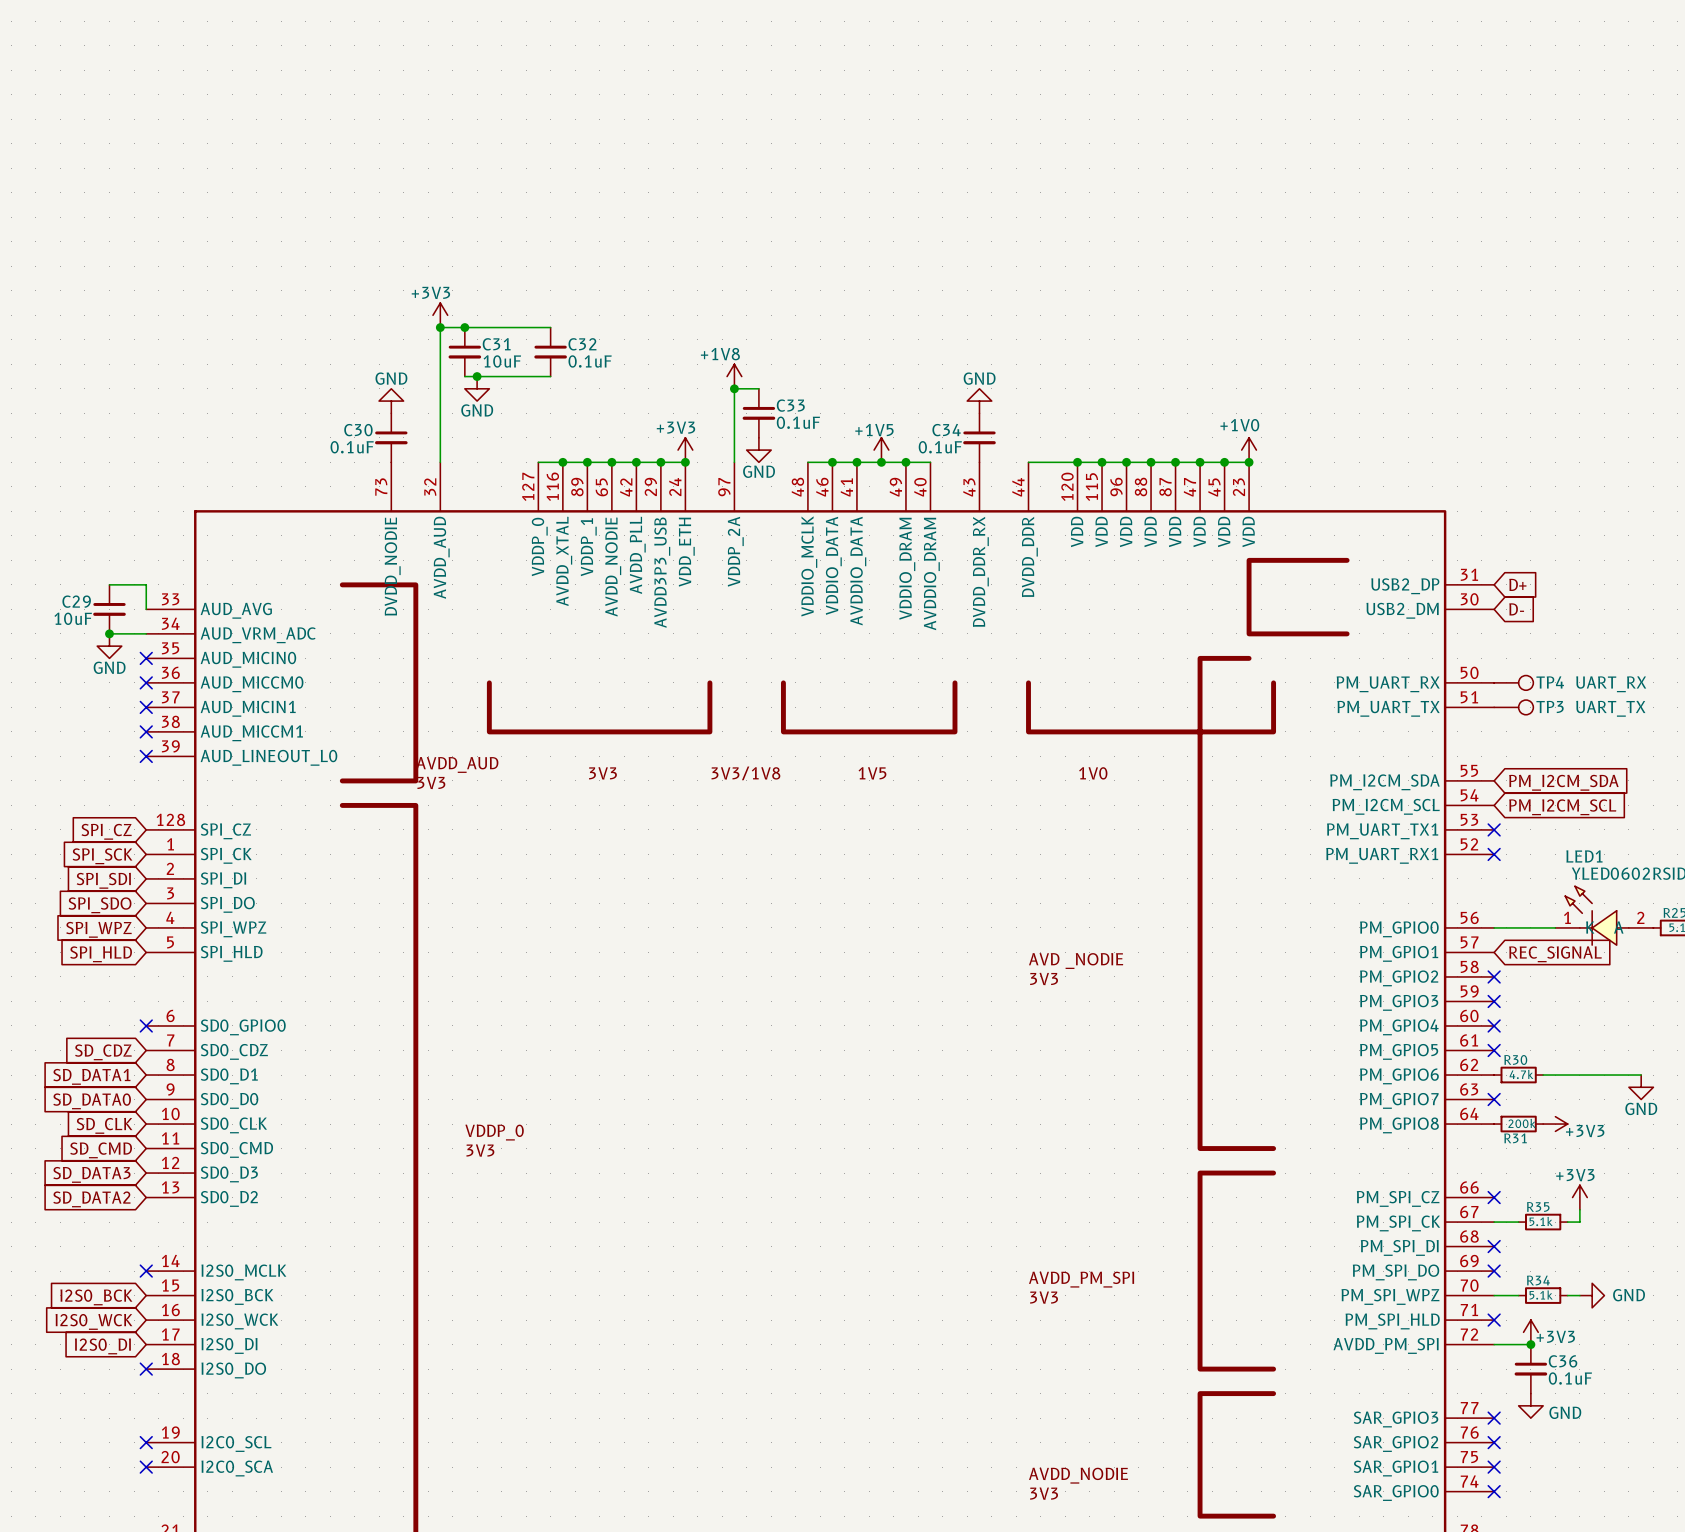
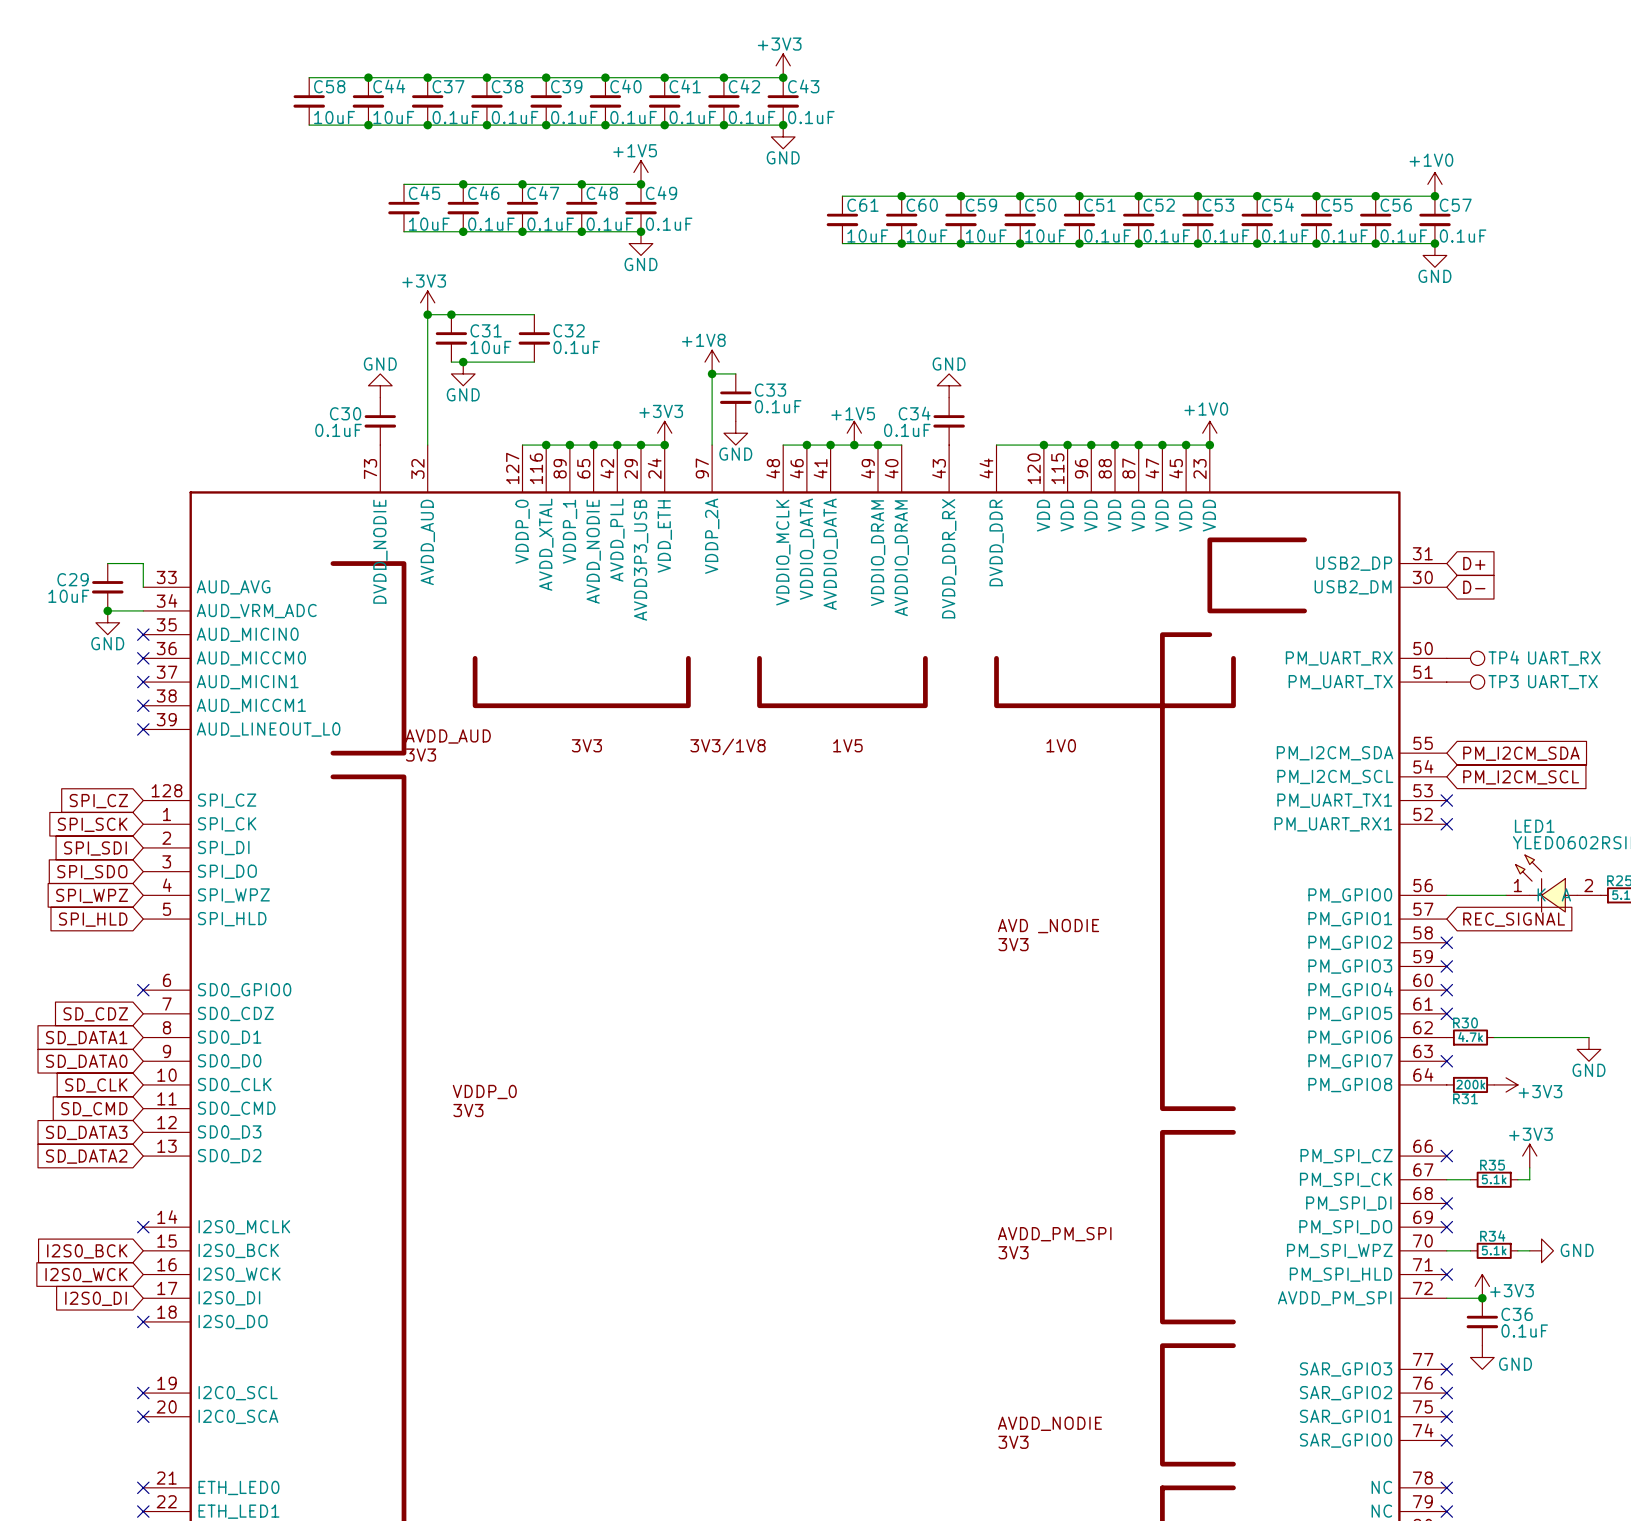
power symbol: none -> +3V3 (783, 65)
wire: none -> (309, 77) (783, 77)
junction: none -> (368, 77)
junction: none -> (427, 77)
junction: none -> (486, 77)
junction: none -> (546, 77)
junction: none -> (605, 77)
junction: none -> (664, 77)
junction: none -> (723, 77)
junction: none -> (783, 77)
C58: none -> 10uF (309, 101)
C44: none -> 10uF (368, 101)
C37: none -> 0.1uF (427, 101)
C38: none -> 0.1uF (486, 101)
C39: none -> 0.1uF (546, 101)
C40: none -> 0.1uF (605, 101)
C41: none -> 0.1uF (664, 101)
C42: none -> 0.1uF (723, 101)
C43: none -> 0.1uF (783, 101)
wire: none -> (309, 125) (783, 125)
junction: none -> (368, 125)
junction: none -> (427, 125)
junction: none -> (486, 125)
junction: none -> (546, 125)
junction: none -> (605, 125)
junction: none -> (664, 125)
junction: none -> (723, 125)
junction: none -> (783, 125)
power symbol: none -> GND (783, 136)
power symbol: none -> +1V5 (641, 172)
wire: none -> (404, 184) (641, 184)
junction: none -> (463, 184)
junction: none -> (522, 184)
junction: none -> (581, 184)
junction: none -> (641, 184)
power symbol: none -> +1V0 (1434, 184)
wire: none -> (842, 196) (1434, 196)
junction: none -> (901, 196)
junction: none -> (960, 196)
junction: none -> (1020, 196)
junction: none -> (1079, 196)
junction: none -> (1138, 196)
junction: none -> (1197, 196)
junction: none -> (1257, 196)
junction: none -> (1316, 196)
junction: none -> (1375, 196)
junction: none -> (1434, 196)
C45: none -> 10uF (404, 208)
C46: none -> 0.1uF (463, 208)
C47: none -> 0.1uF (522, 208)
C48: none -> 0.1uF (581, 208)
C49: none -> 0.1uF (641, 208)
C61: none -> 10uF (842, 219)
C60: none -> 10uF (901, 219)
C59: none -> 10uF (960, 219)
C50: none -> 10uF (1020, 219)
C51: none -> 0.1uF (1079, 219)
C52: none -> 0.1uF (1138, 219)
C53: none -> 0.1uF (1197, 219)
C54: none -> 0.1uF (1257, 219)
C55: none -> 0.1uF (1316, 219)
C56: none -> 0.1uF (1375, 219)
C57: none -> 0.1uF (1434, 219)
wire: none -> (404, 231) (641, 231)
junction: none -> (463, 231)
junction: none -> (522, 231)
junction: none -> (581, 231)
junction: none -> (641, 231)
power symbol: none -> GND (641, 243)
wire: none -> (842, 243) (1434, 243)
junction: none -> (901, 243)
junction: none -> (960, 243)
junction: none -> (1020, 243)
junction: none -> (1079, 243)
junction: none -> (1138, 243)
junction: none -> (1197, 243)
junction: none -> (1257, 243)
junction: none -> (1316, 243)
junction: none -> (1375, 243)
junction: none -> (1434, 243)
power symbol: none -> GND (1434, 255)

